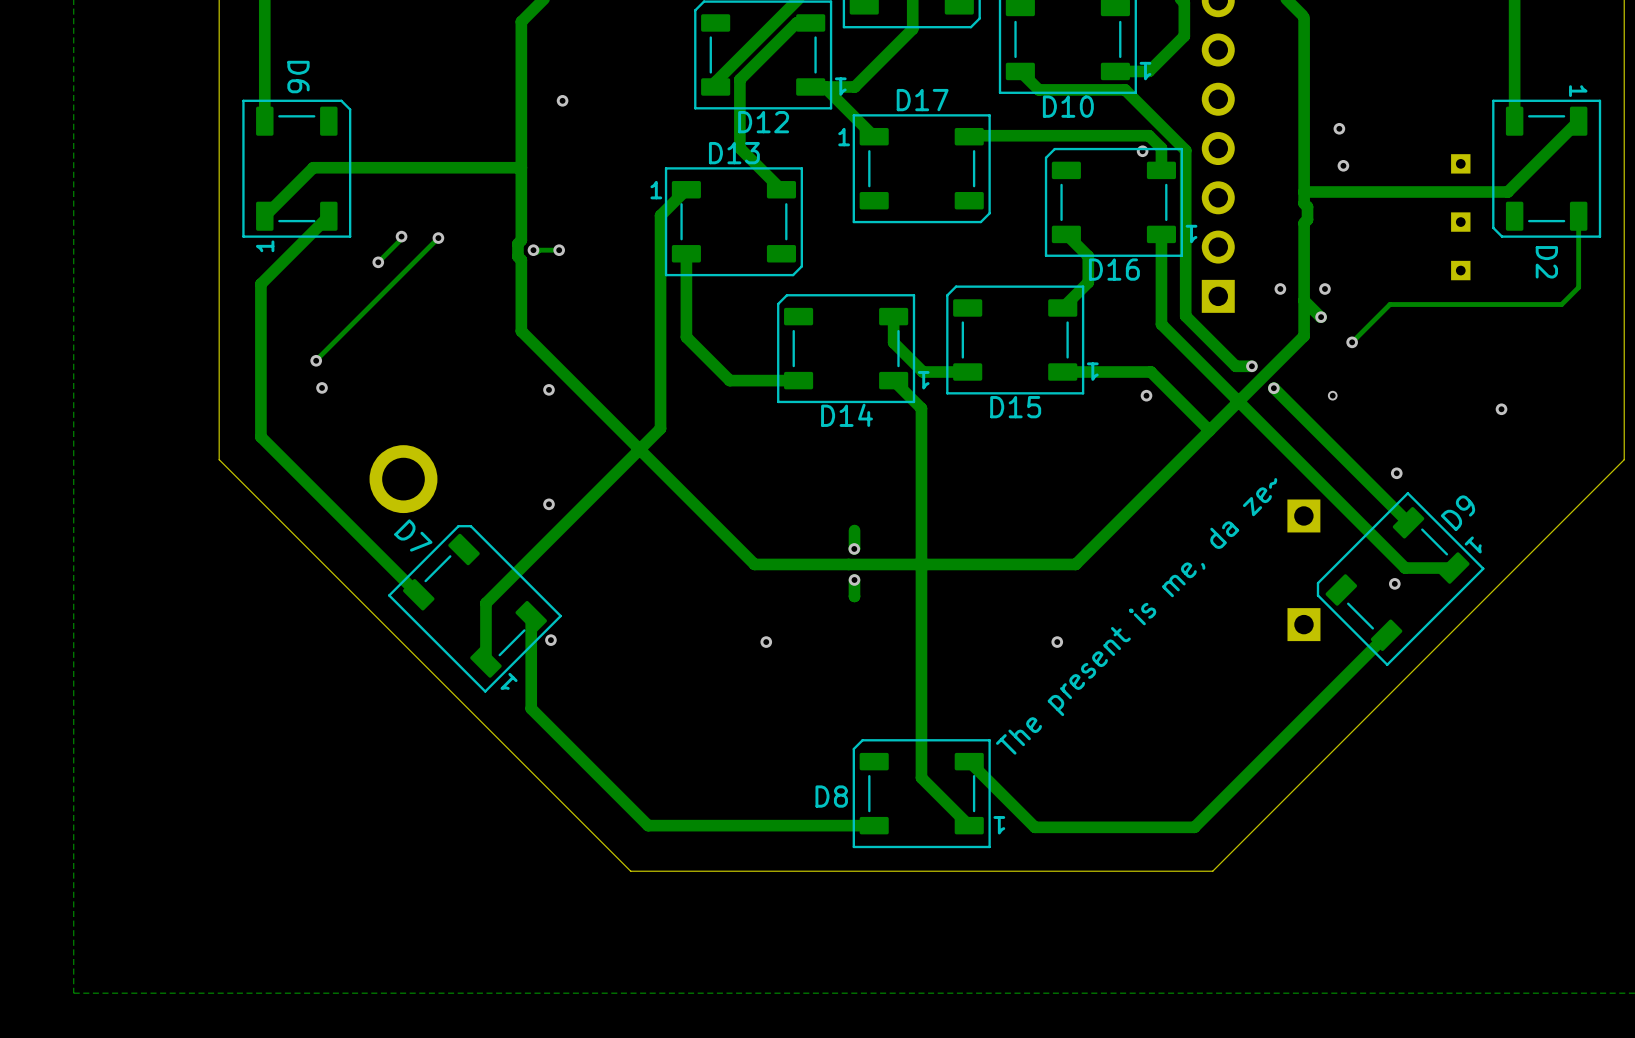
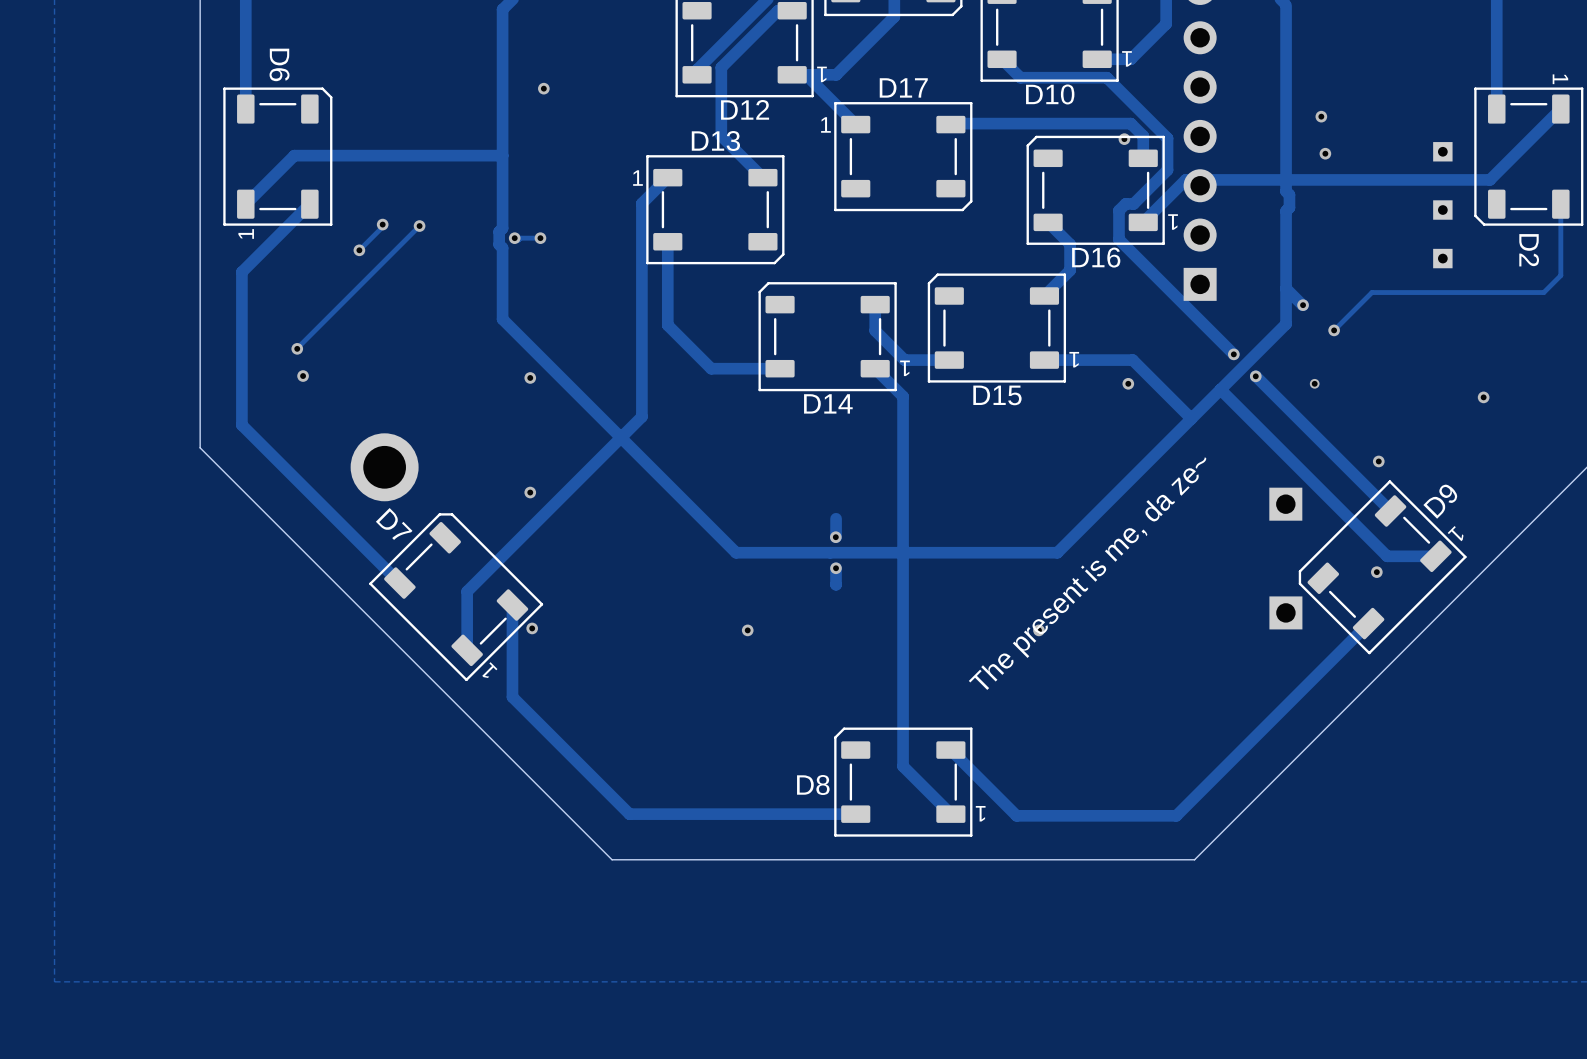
track: (1185, 182) (1185, 316) (1235, 366) (1251, 366) -> (1167, 170) (1133, 203) (1125, 203) (1118, 210) (1118, 239) (1233, 354)
track: (1161, 234) (1161, 324) (1238, 401) -> (1143, 222) (1185, 179) (1286, 179)
via: (1280, 288) -> none
via: (1324, 288) -> none
text position: The present is me, da ze~ (1136, 616) -> The present is me, da ze~ (1087, 573)

